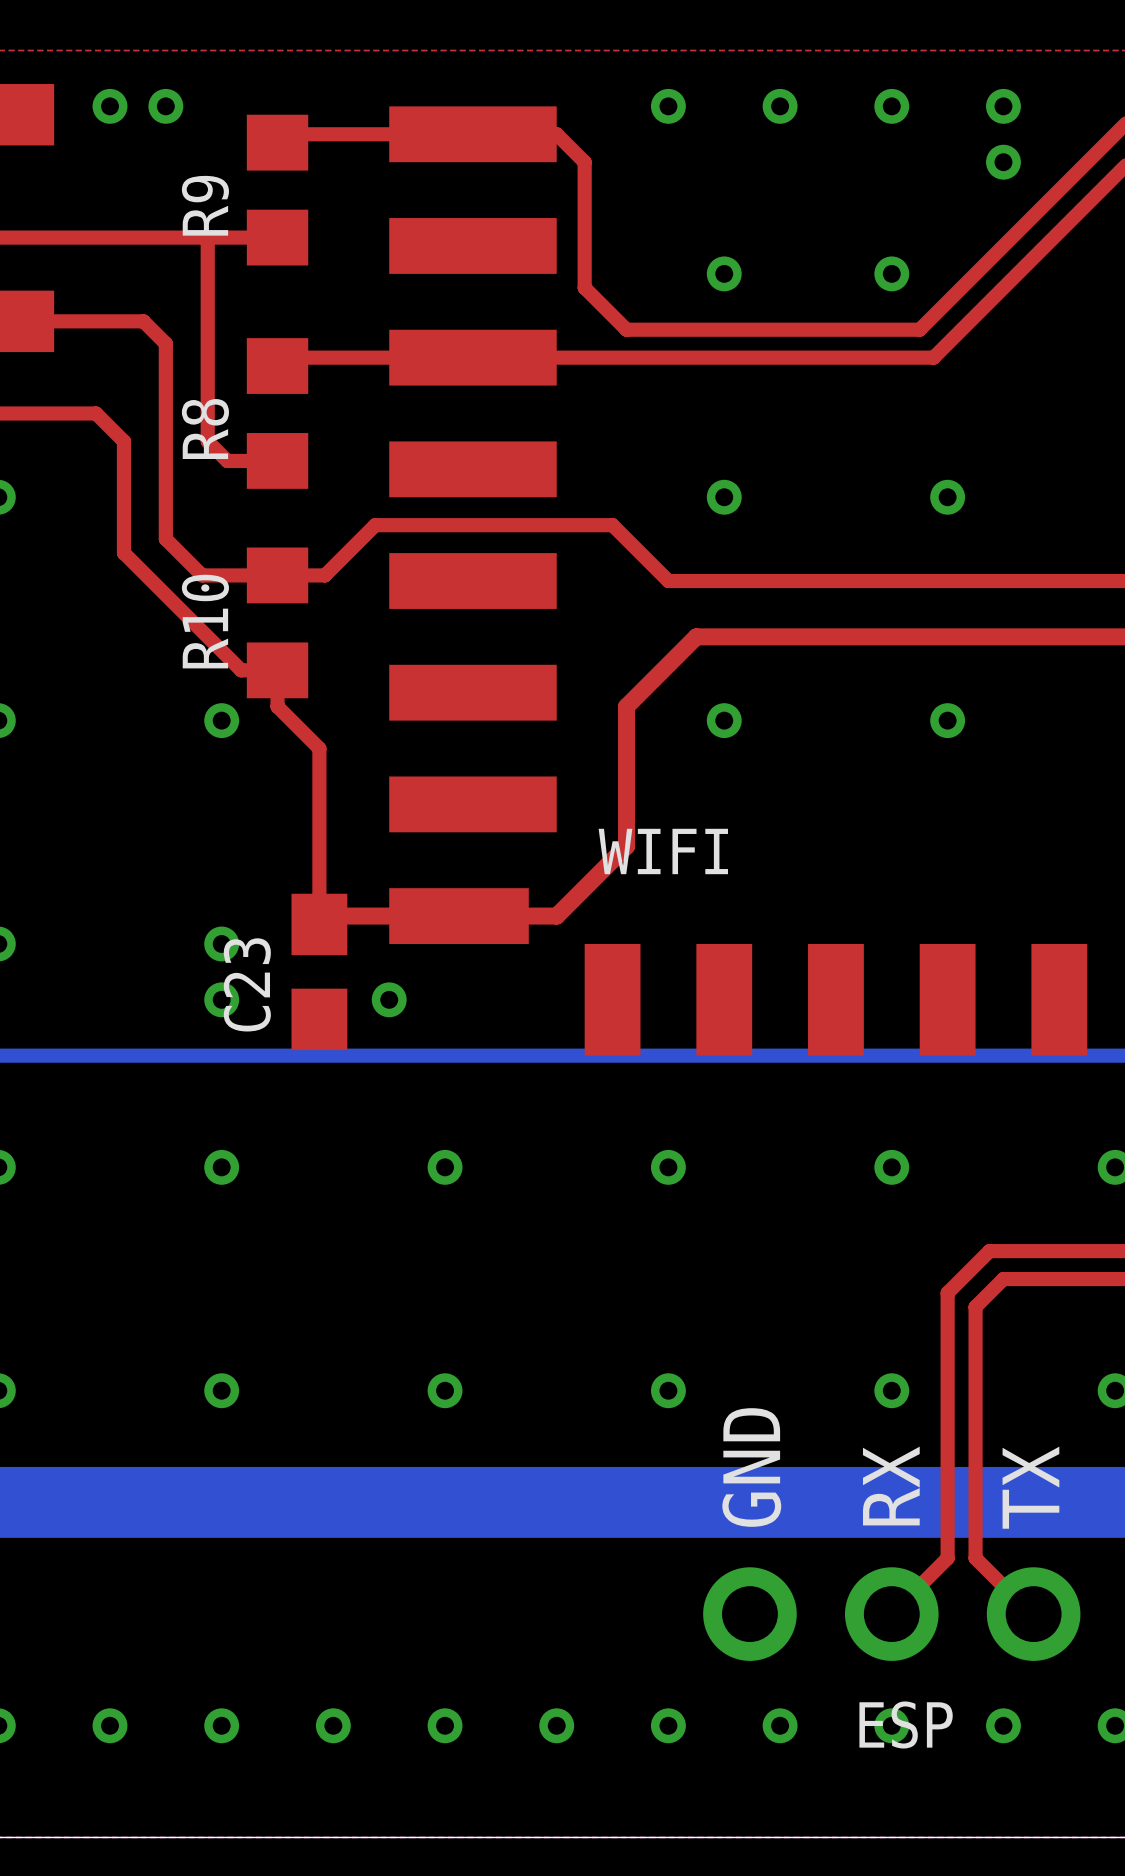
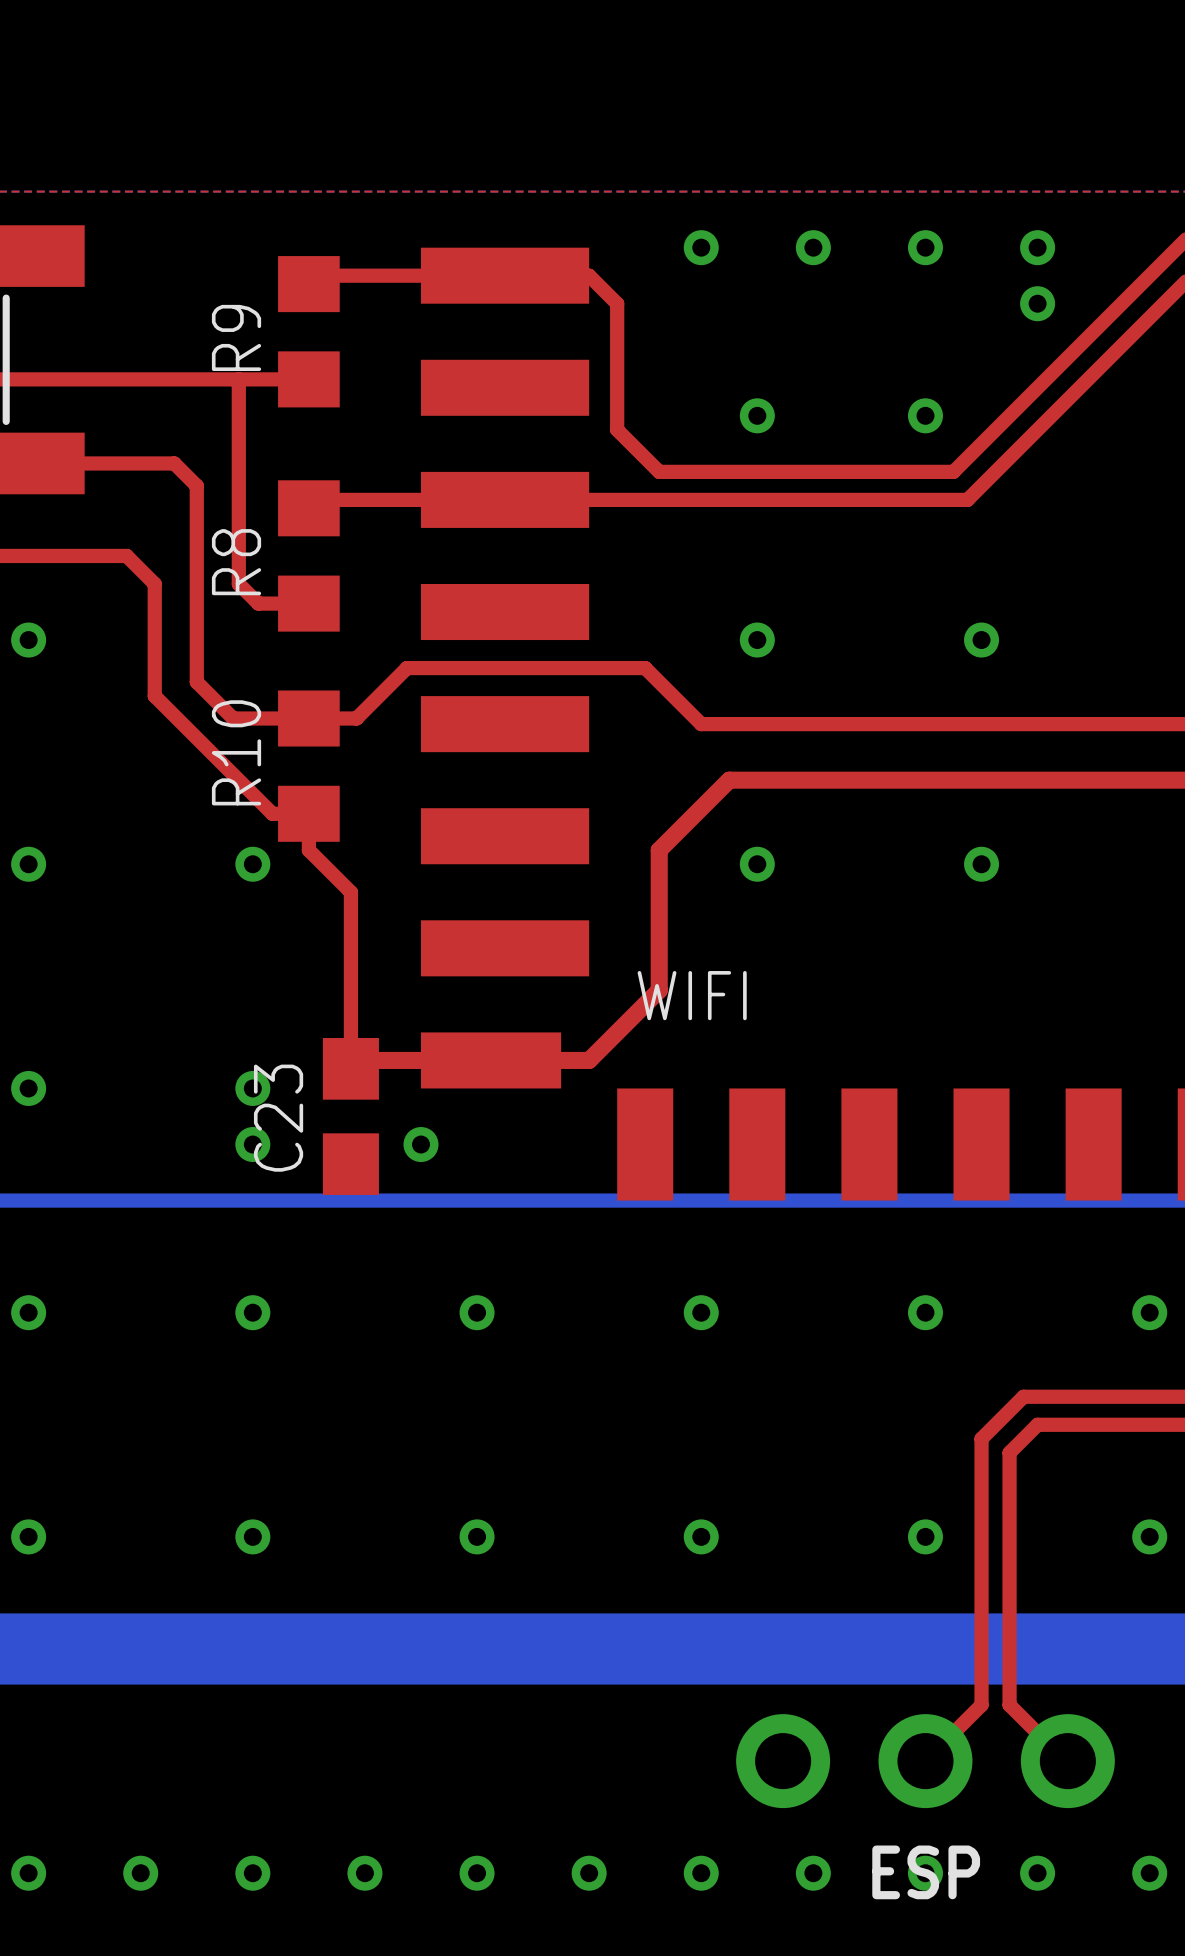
via: (110, 106) -> none
via: (165, 106) -> none
text: GND (751, 1467) -> none
text: RX (891, 1486) -> none
text: TX (1030, 1487) -> none

